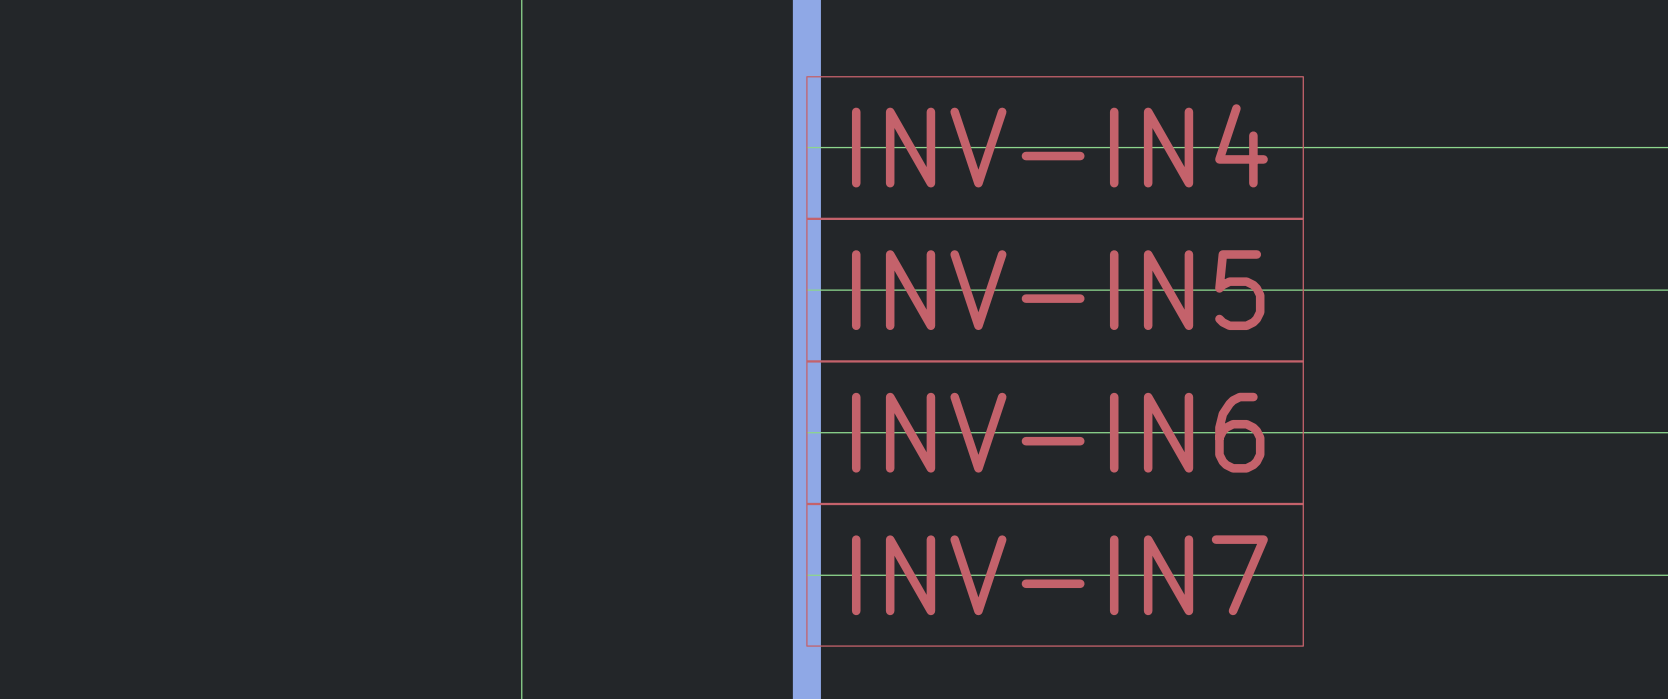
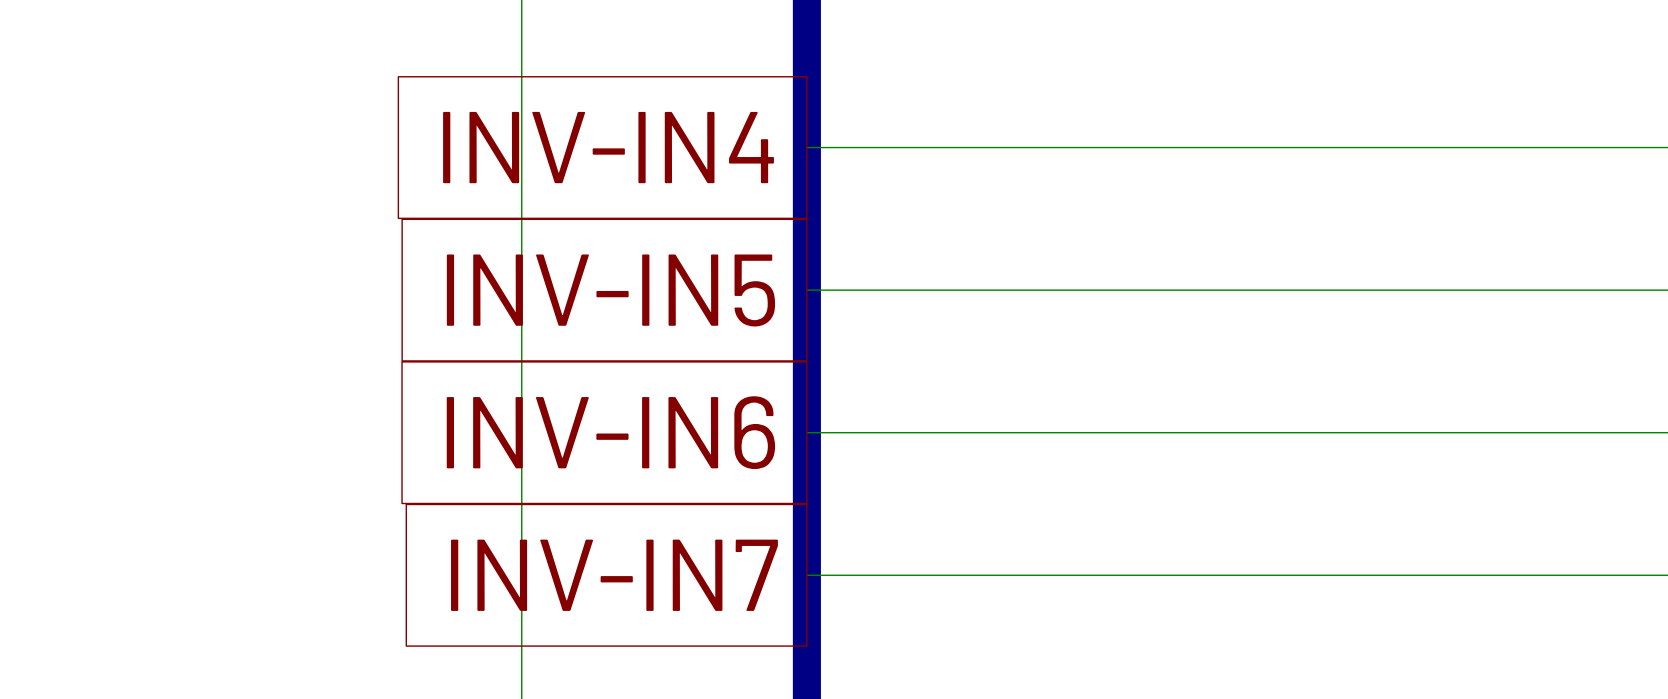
global label rotation: 0° (1059, 145) -> 180° (608, 147)
global label rotation: 0° (1058, 290) -> 180° (610, 290)
global label rotation: 0° (1058, 432) -> 180° (610, 432)
global label rotation: 0° (1059, 575) -> 180° (614, 575)

